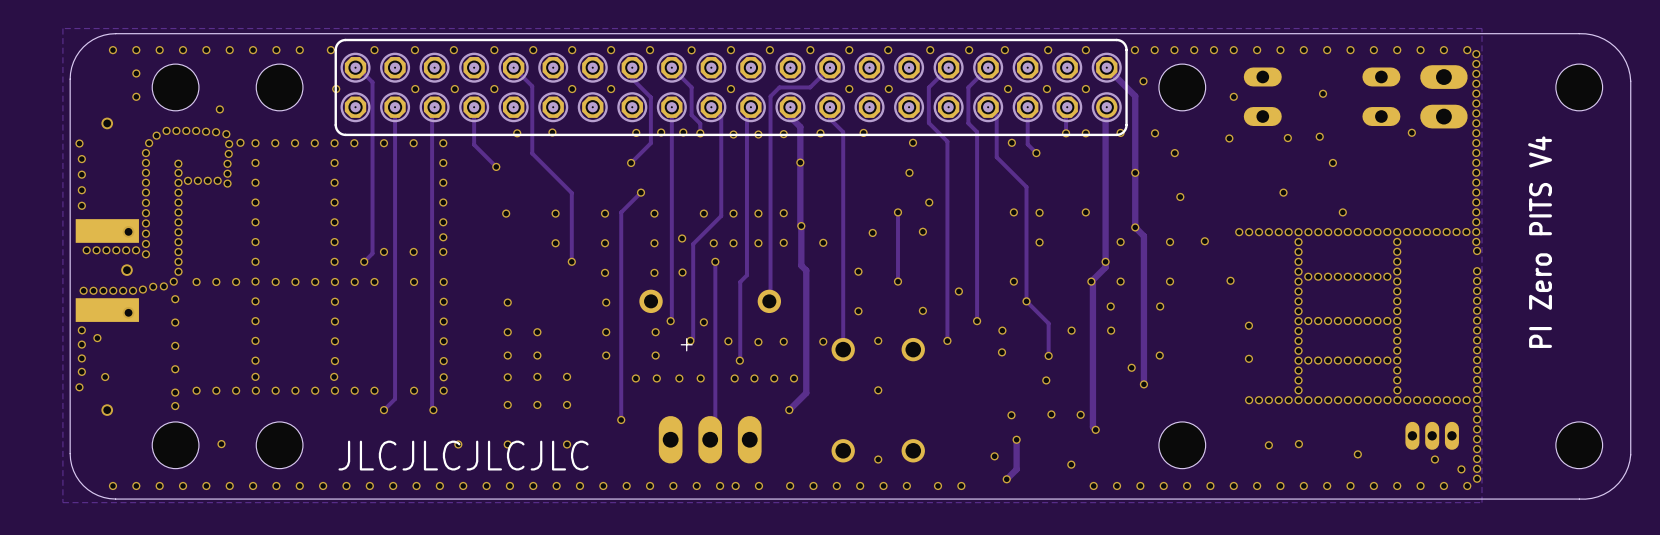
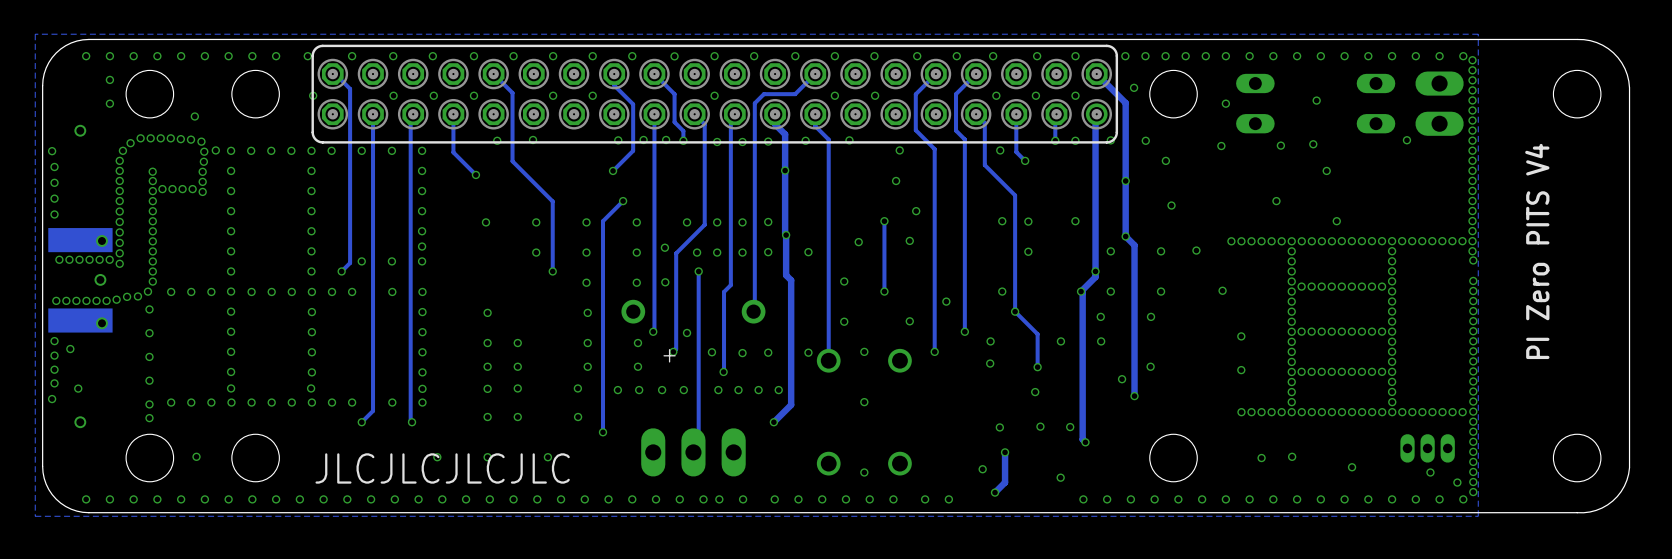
via: (567, 376) -> none
via: none -> (577, 388)
via: (567, 404) -> none
via: none -> (578, 417)

